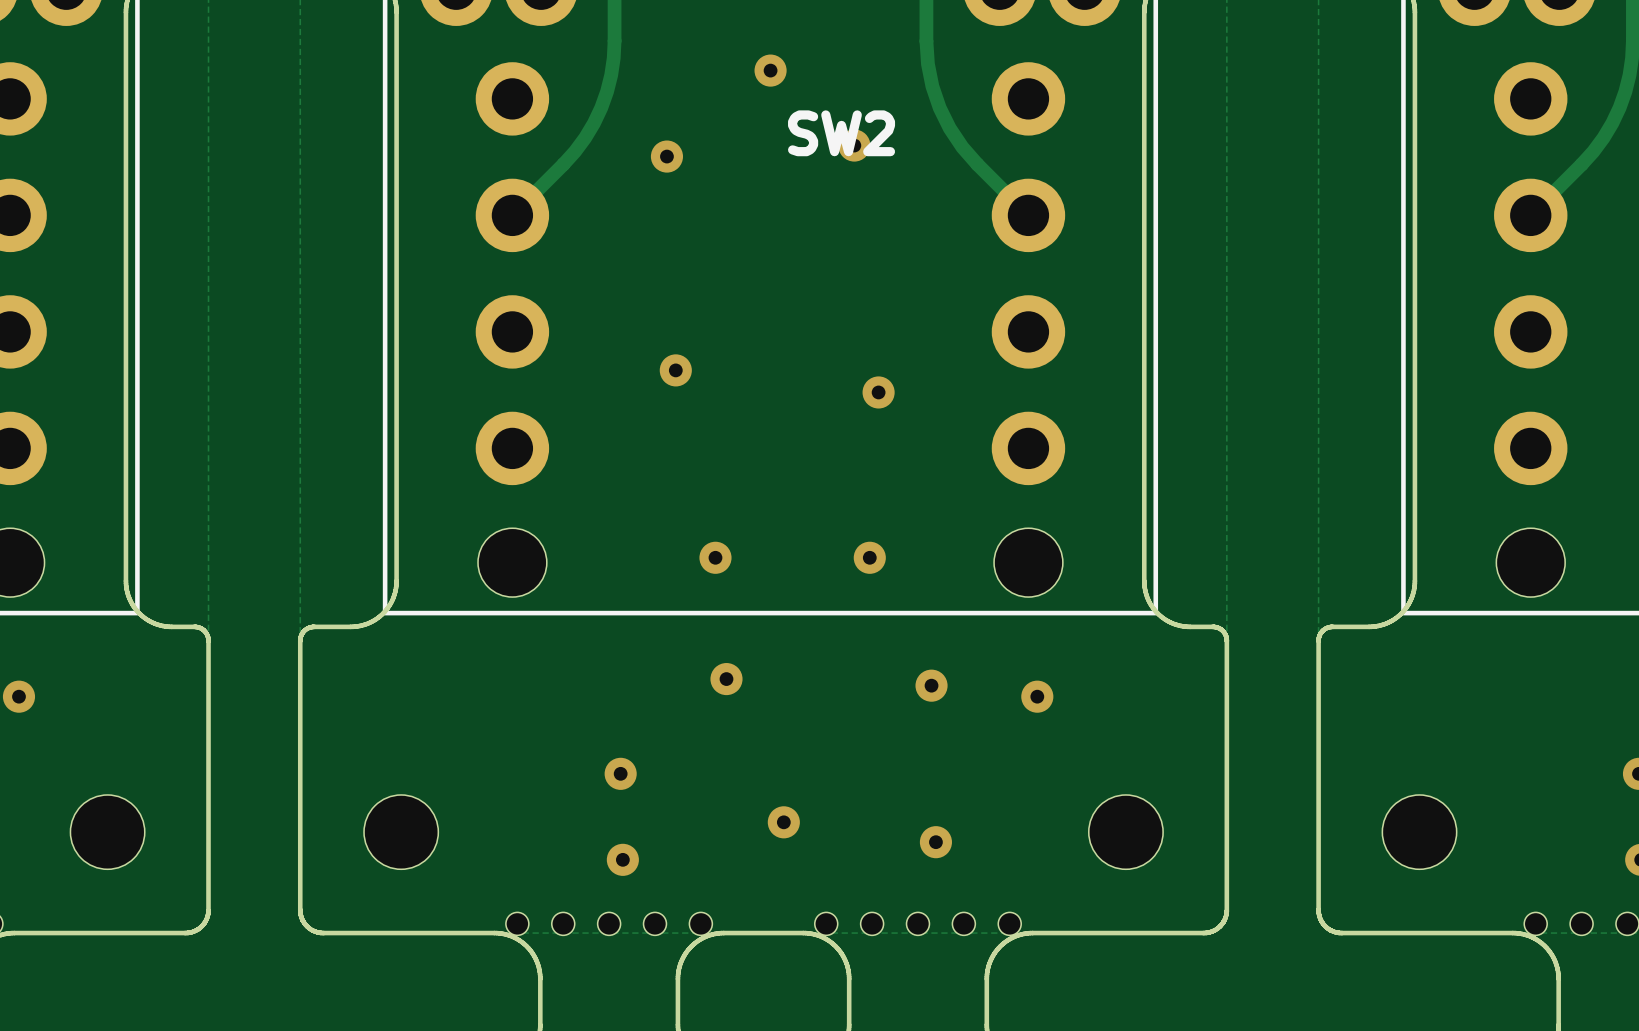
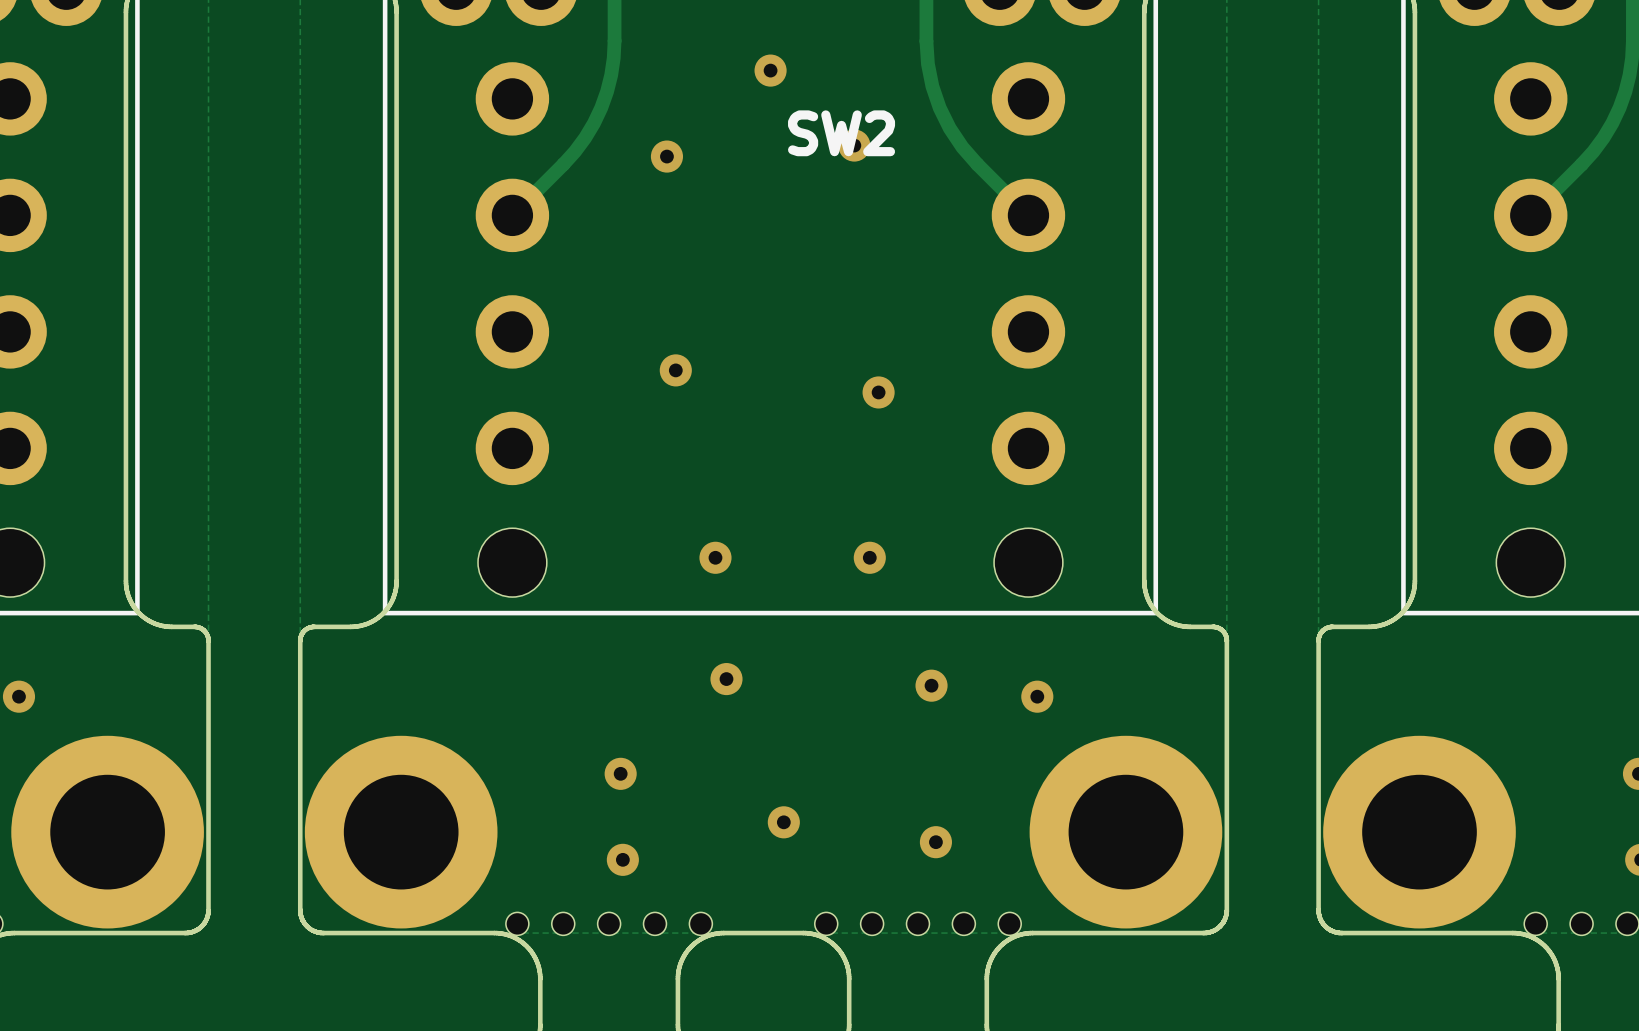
part footprint: [70, 794, 145, 870] -> [11, 735, 204, 929]
part footprint: [364, 794, 439, 870] -> [304, 735, 498, 929]
part footprint: [1088, 794, 1164, 870] -> [1029, 735, 1223, 929]
part footprint: [1382, 794, 1457, 870] -> [1323, 735, 1516, 929]

